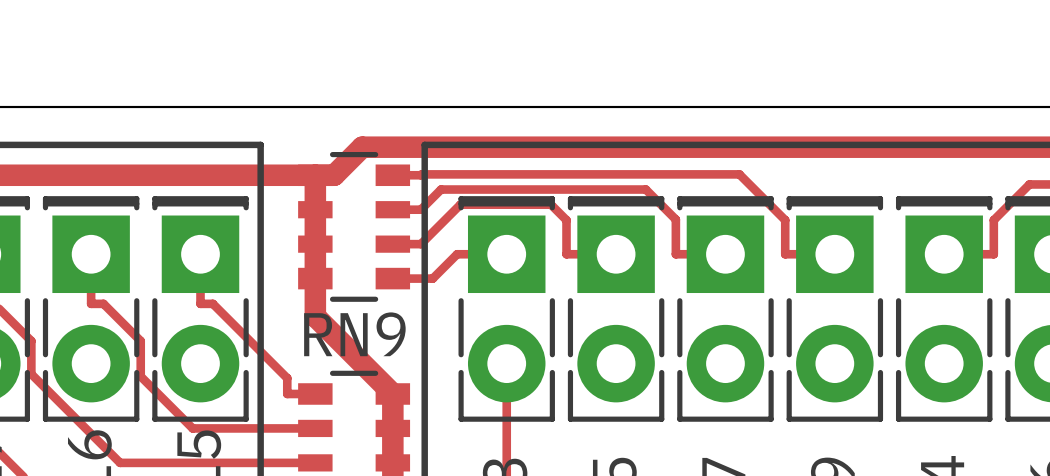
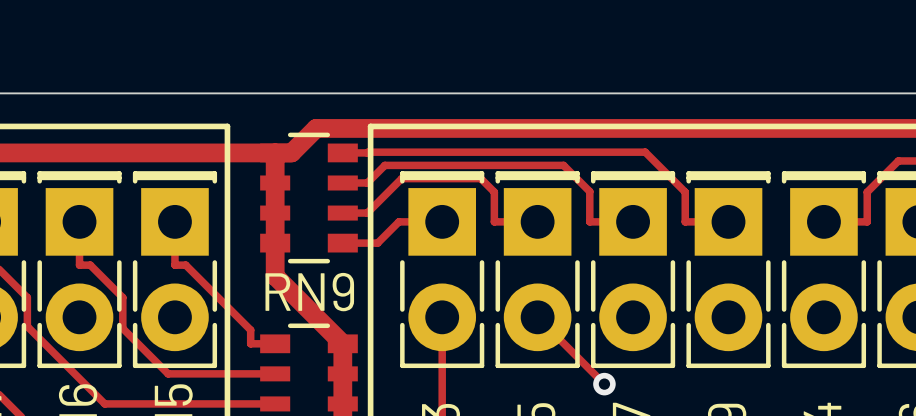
track: none -> (537, 317) (604, 384)
via: none -> (604, 384)

